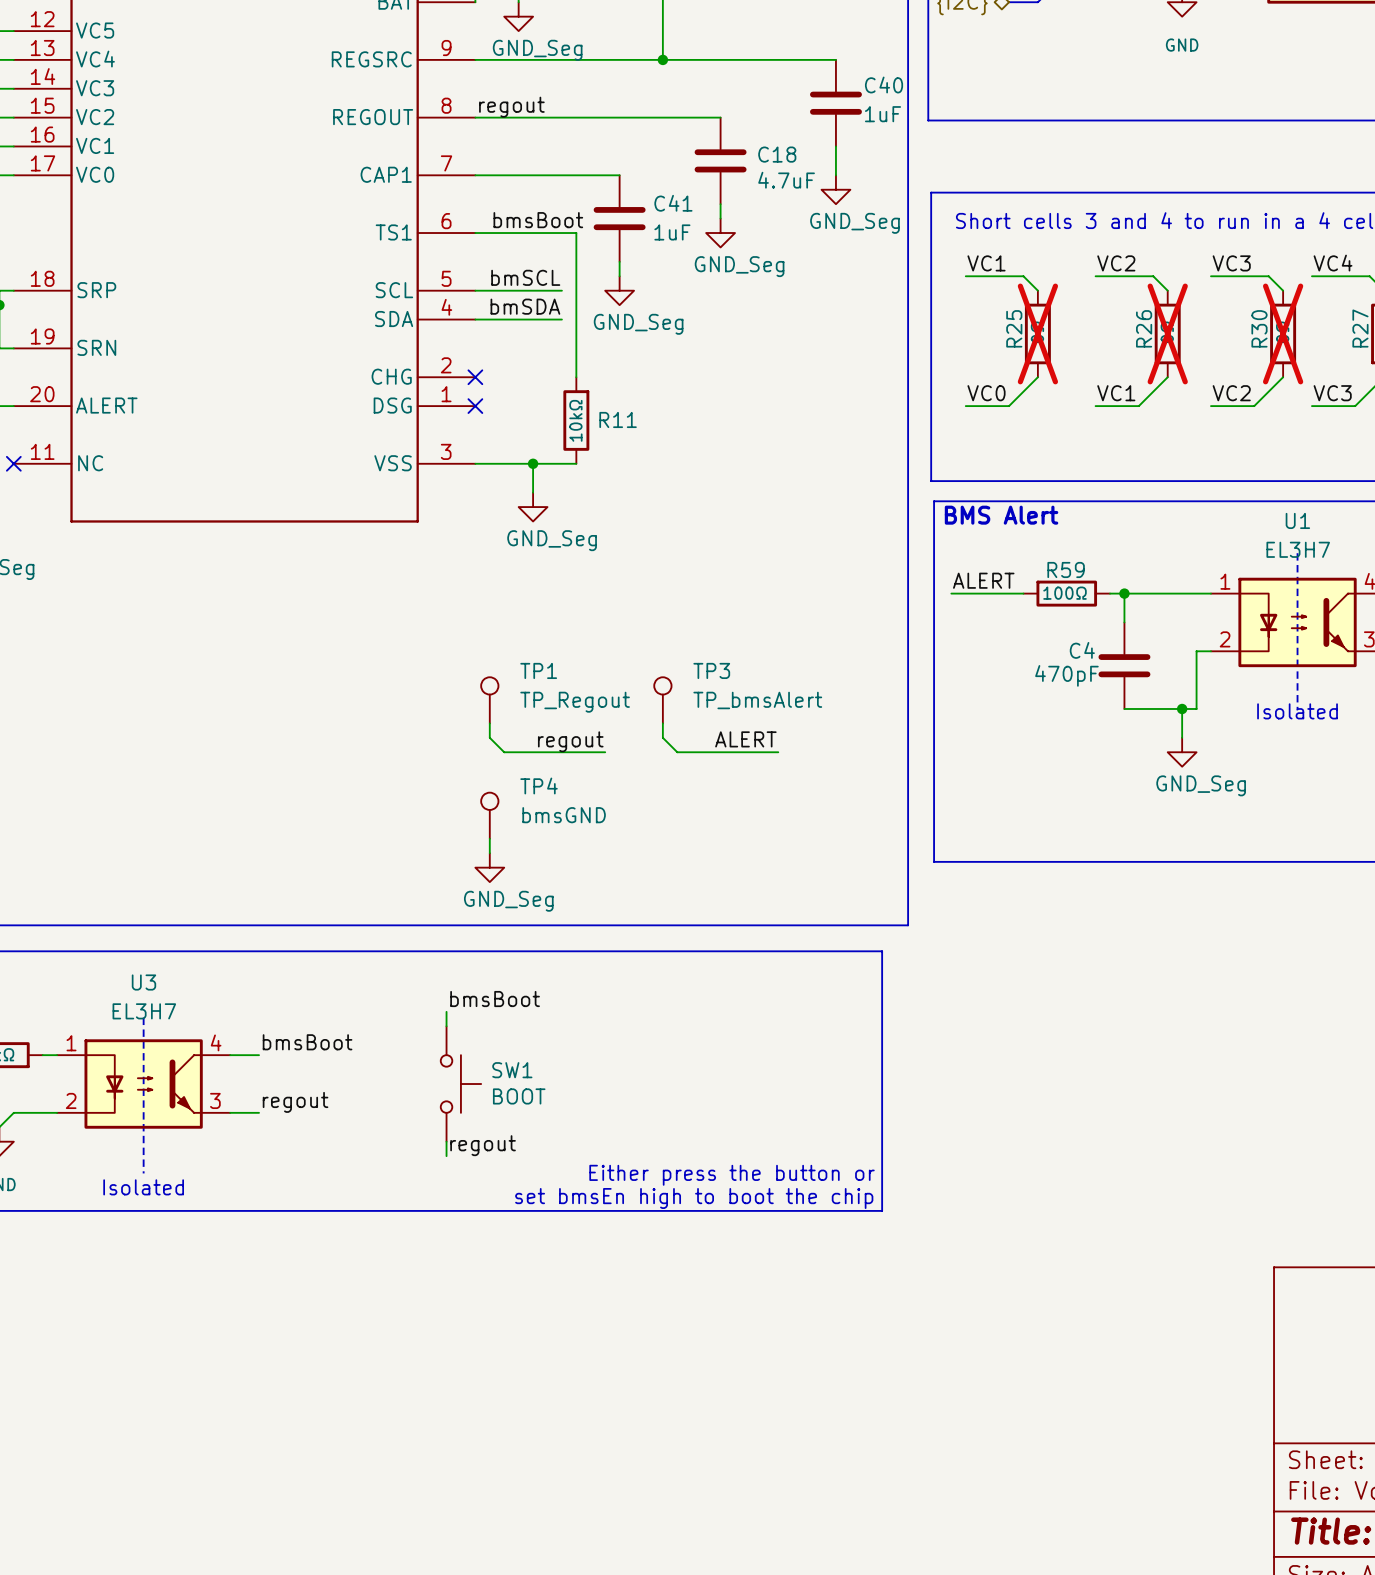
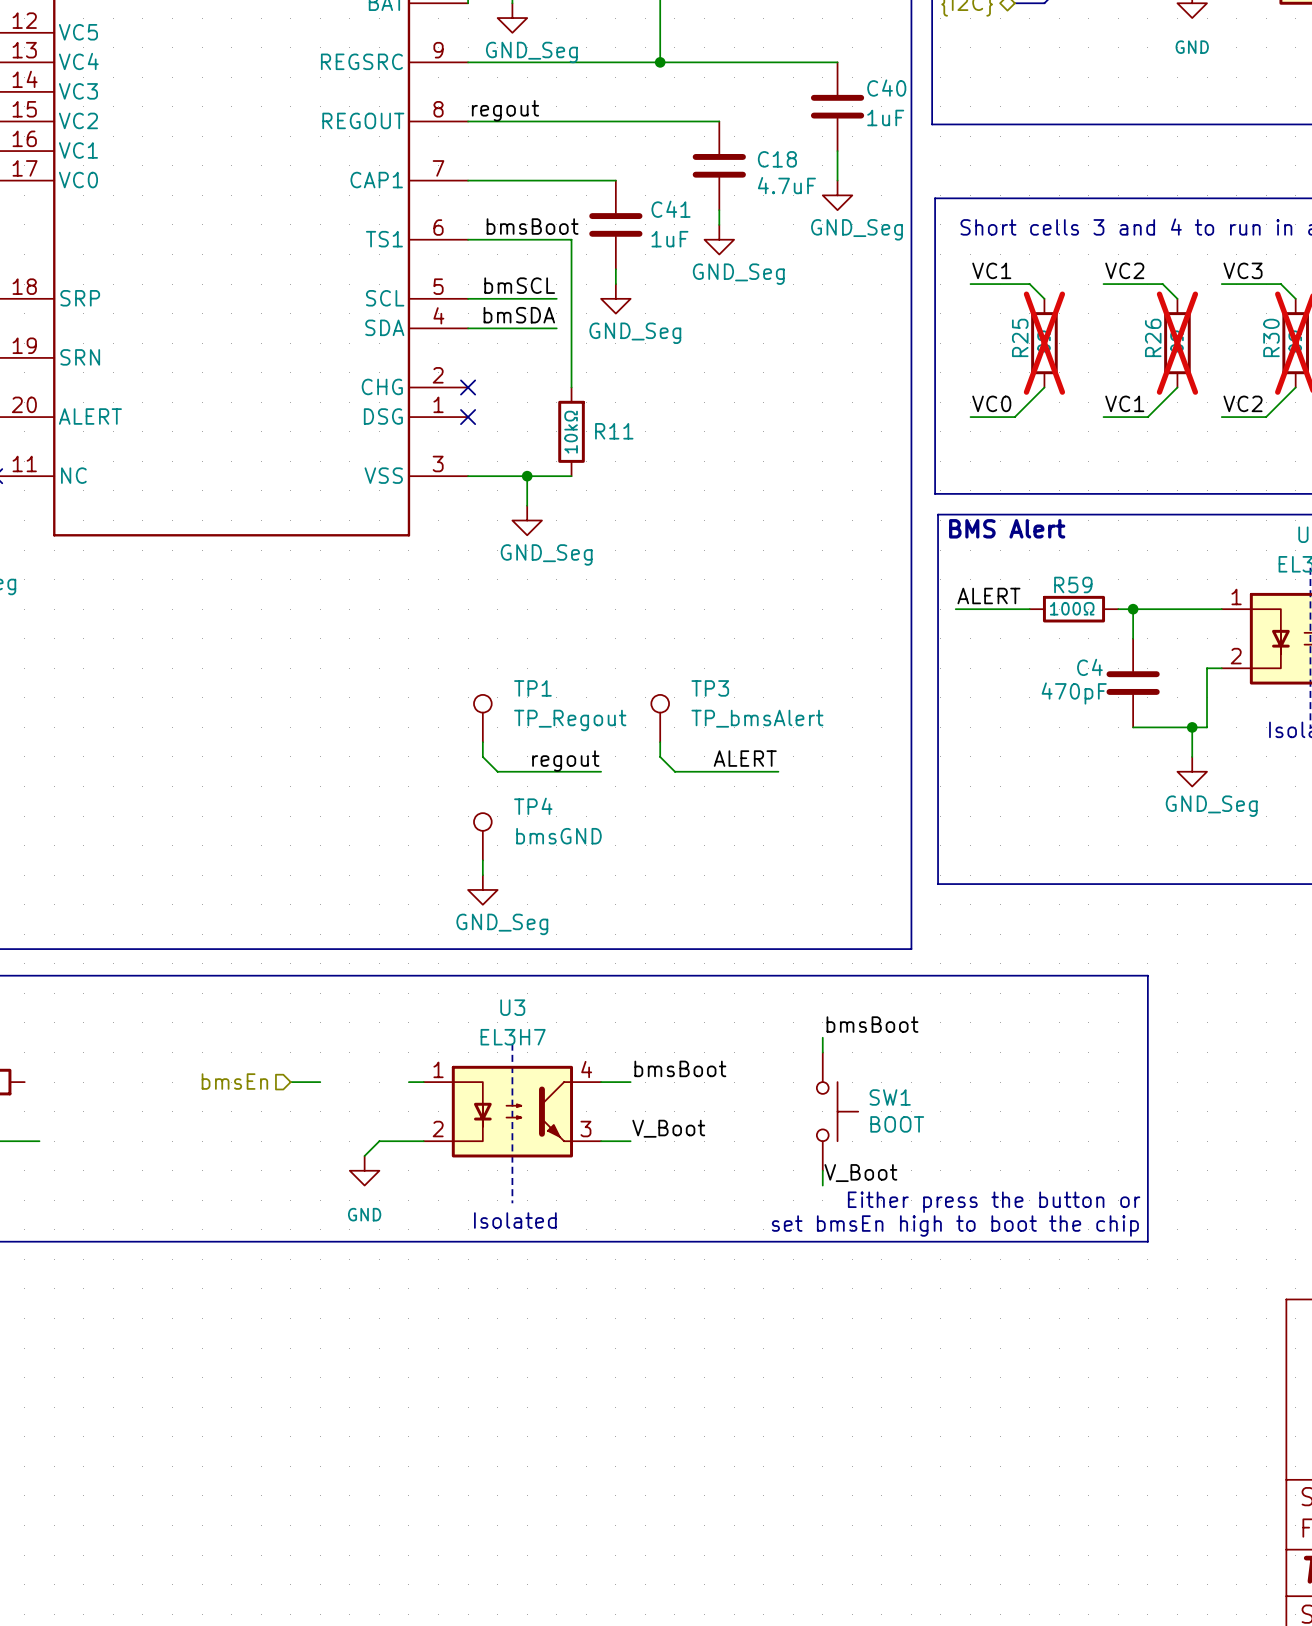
line: (882, 951) (882, 1210) -> (884, 975) (1147, 975) (1147, 1241) (884, 1241)
label: bmsBoot (495, 999) -> none
label: none -> bmsBoot (872, 1024)
wire: (446, 1011) (446, 1026) -> none
wire: none -> (822, 1037) (822, 1052)
line: (143, 1017) (143, 1173) -> none
line: none -> (512, 1043) (512, 1203)
label: bmsBoot (307, 1042) -> none
label: none -> bmsBoot (680, 1068)
hierarchical label: none -> bmsEn (234, 1081)
wire: (42, 1055) (57, 1055) -> none
wire: (230, 1055) (259, 1055) -> (290, 1082) (320, 1082)
wire: none -> (408, 1082) (423, 1082)
wire: none -> (601, 1082) (630, 1082)
U3 position: (143, 1084) -> (512, 1111)
SW1 position: (460, 1084) -> (837, 1111)
label: none -> V_Boot (668, 1128)
label: regout (295, 1102) -> none
wire: (230, 1112) (259, 1112) -> none
wire: none -> (423, 1141) (379, 1141) (364, 1155)
wire: none -> (601, 1141) (630, 1141)
power symbol: none -> GND (364, 1170)
wire: (446, 1141) (446, 1156) -> none
wire: none -> (822, 1170) (822, 1185)
label: none -> V_Boot (860, 1173)
label: regout (483, 1145) -> none
text position: Either press the button or (732, 1175) -> Either press the button or (994, 1202)
text: Isolated (143, 1187) -> none
text: none -> Isolated (515, 1220)
text position: set bmsEn high to boot the chip (694, 1198) -> set bmsEn high to boot the chip (955, 1225)

